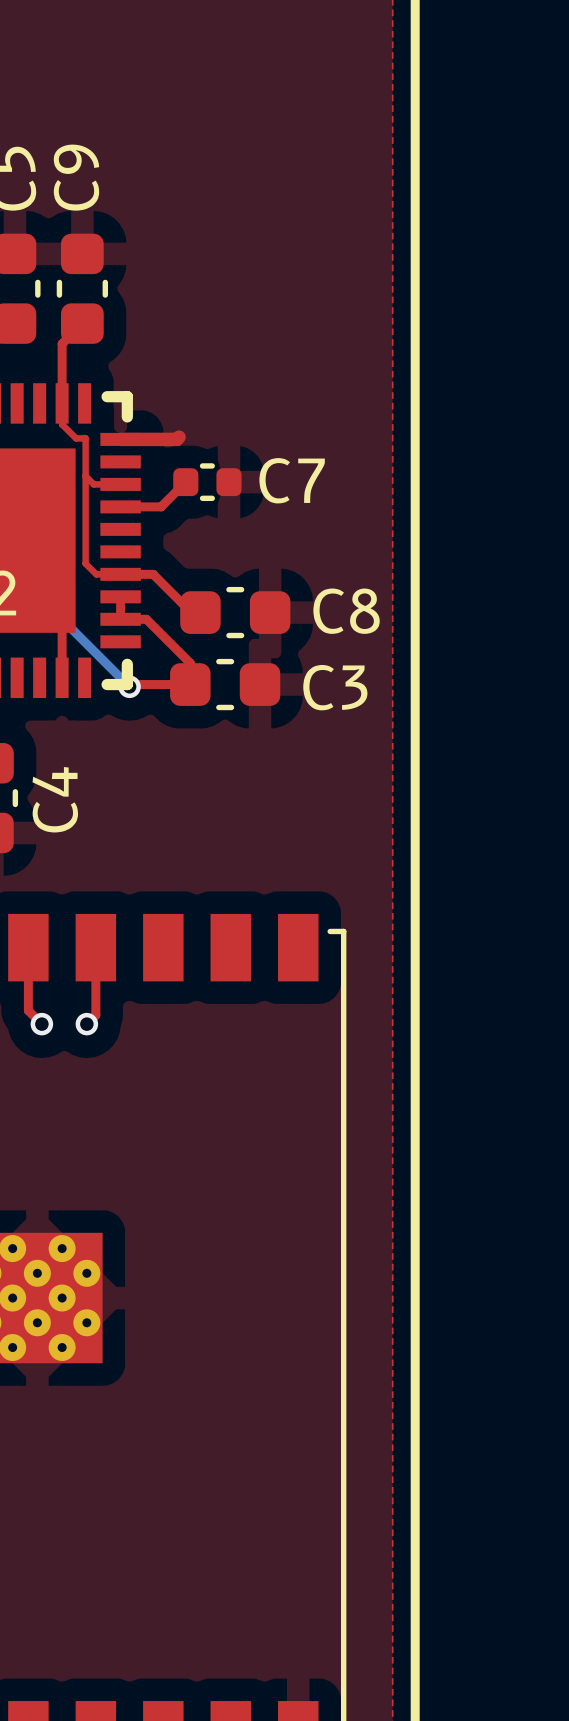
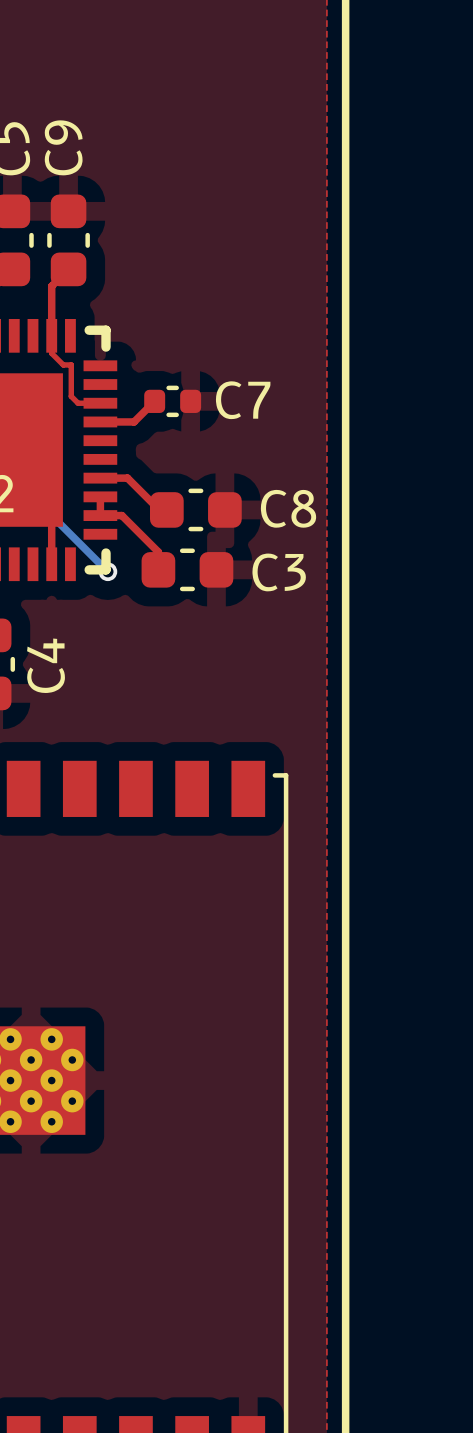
top track: (179, 437) (176, 439) (120, 439) -> none
top track: (85, 476) (85, 563) (96, 574) (120, 574) -> none
top track: (190, 684) (131, 684) (129, 686) -> none
top track: (28, 947) (28, 1010) (41, 1024) -> none
top track: (95, 947) (95, 1015) (86, 1024) -> none
via: (41, 1024) -> none
via: (86, 1024) -> none

